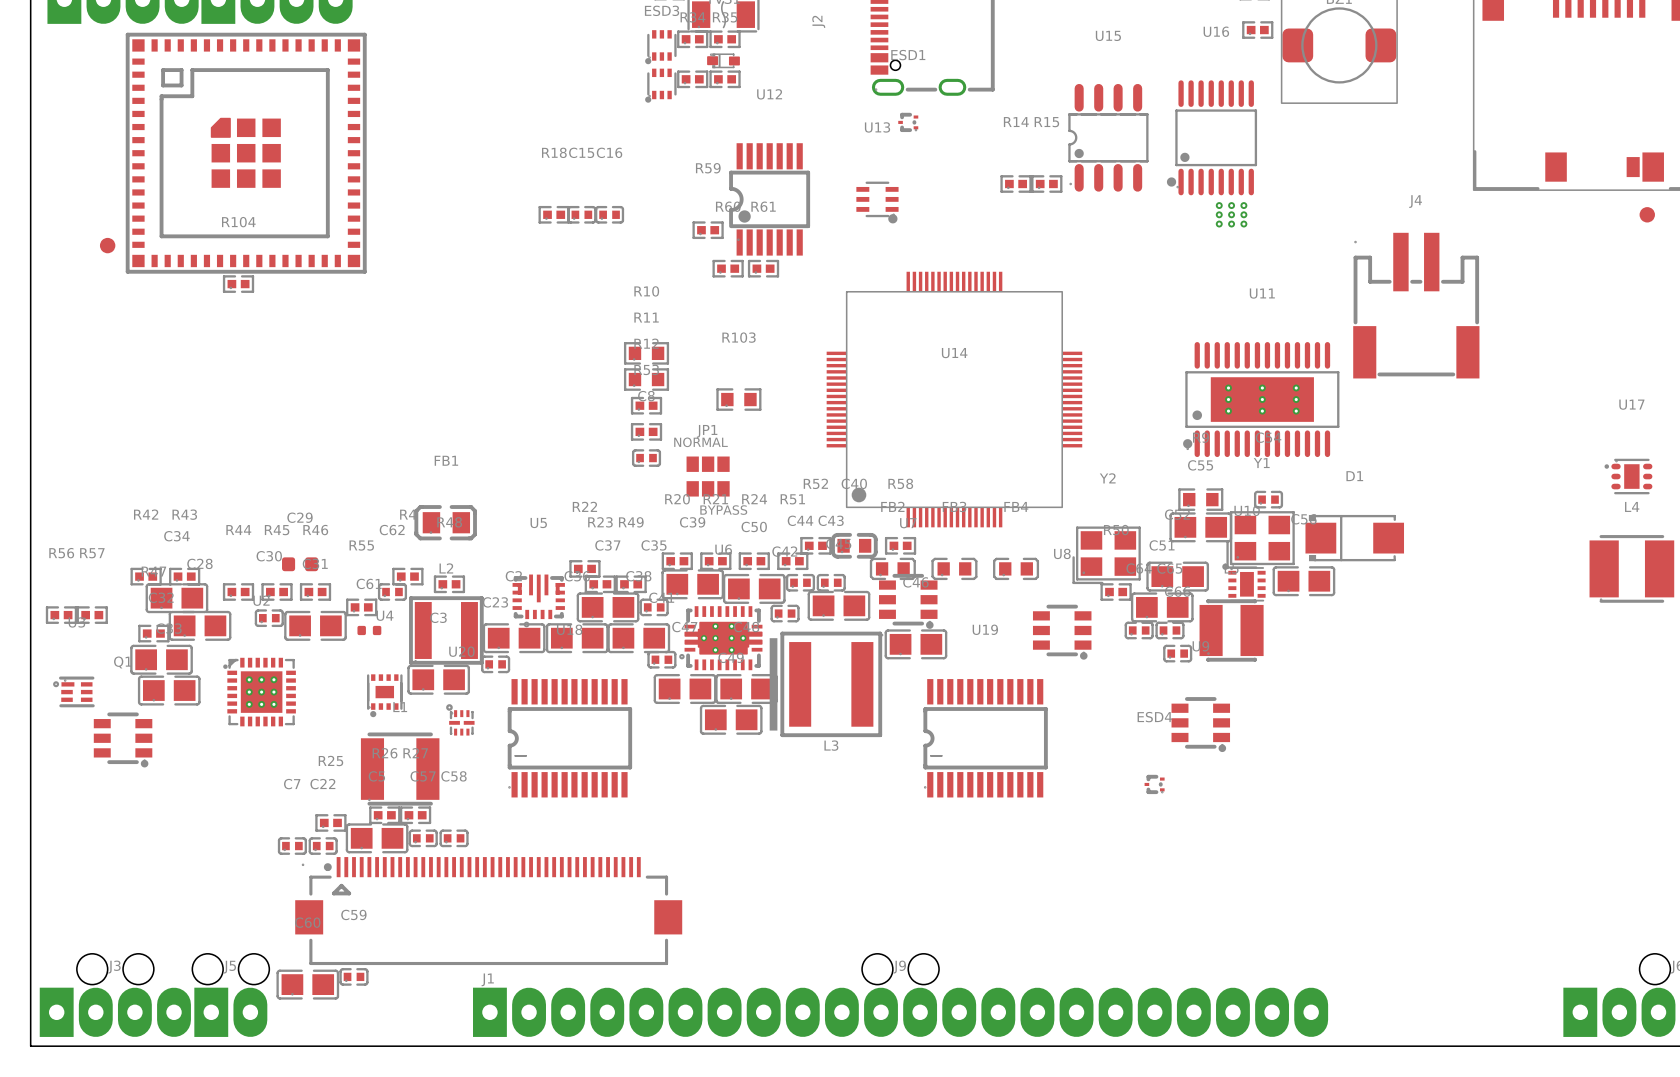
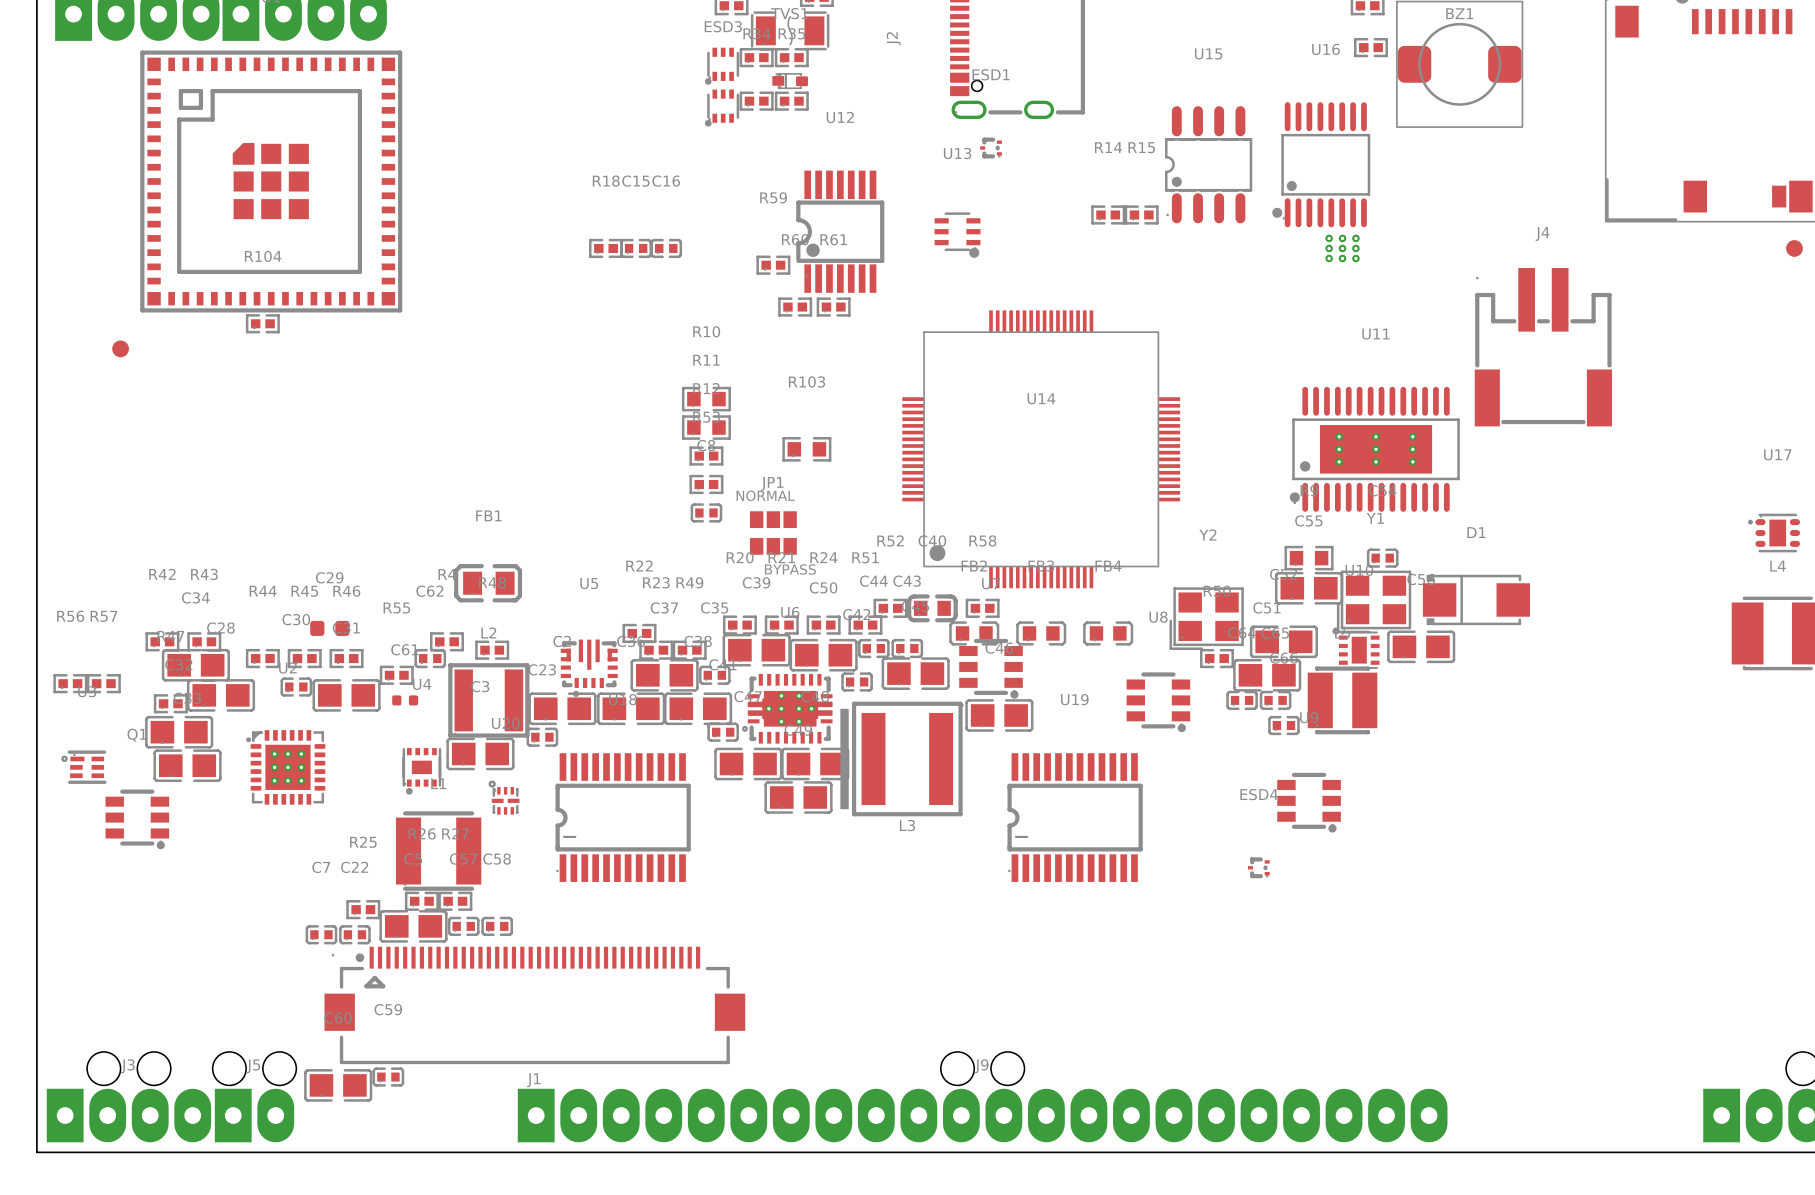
part position: (107, 245) -> (120, 348)

